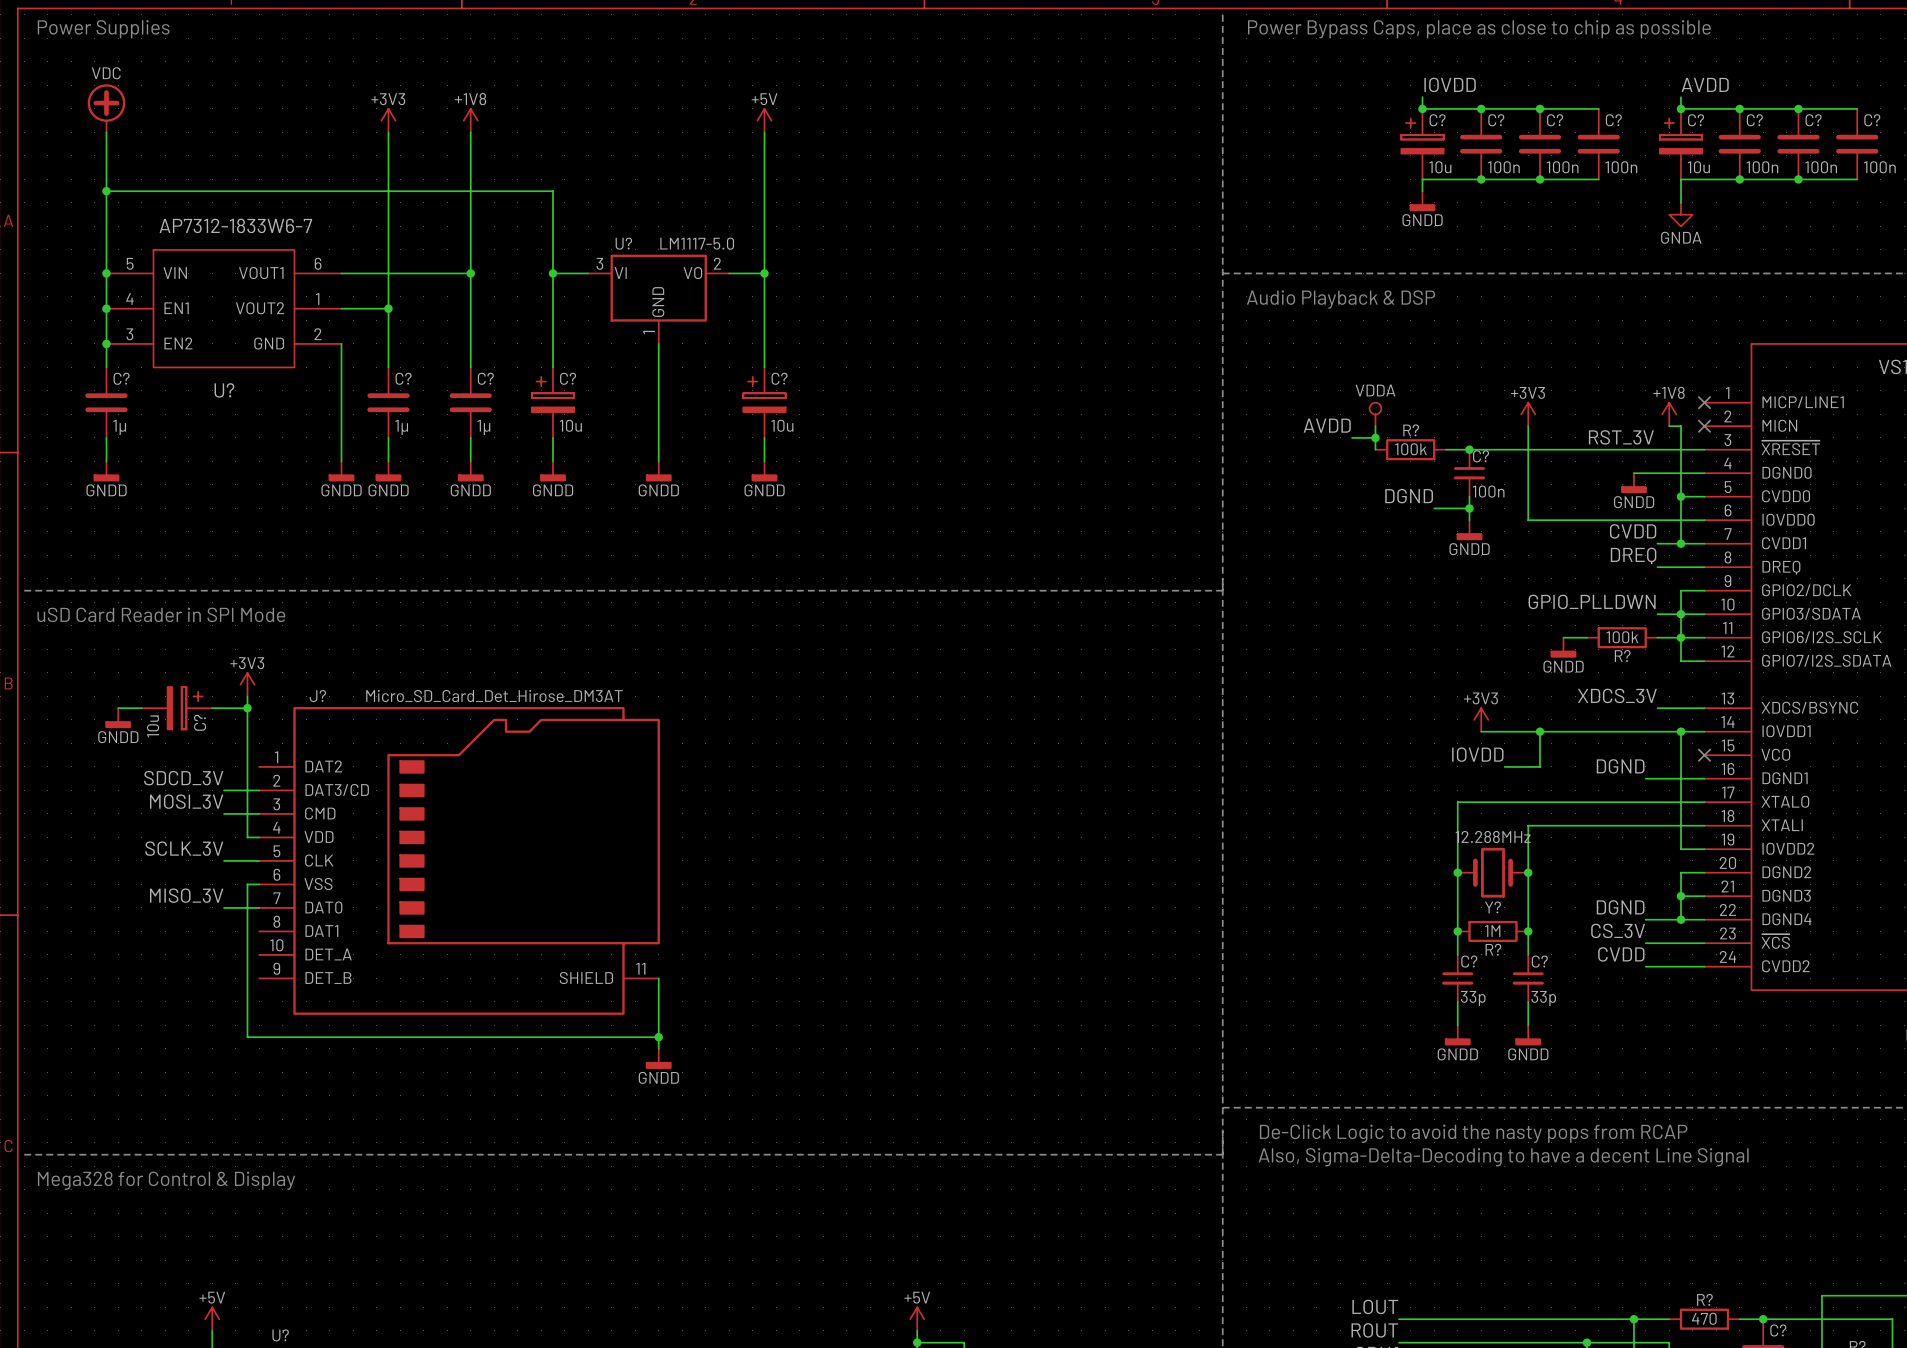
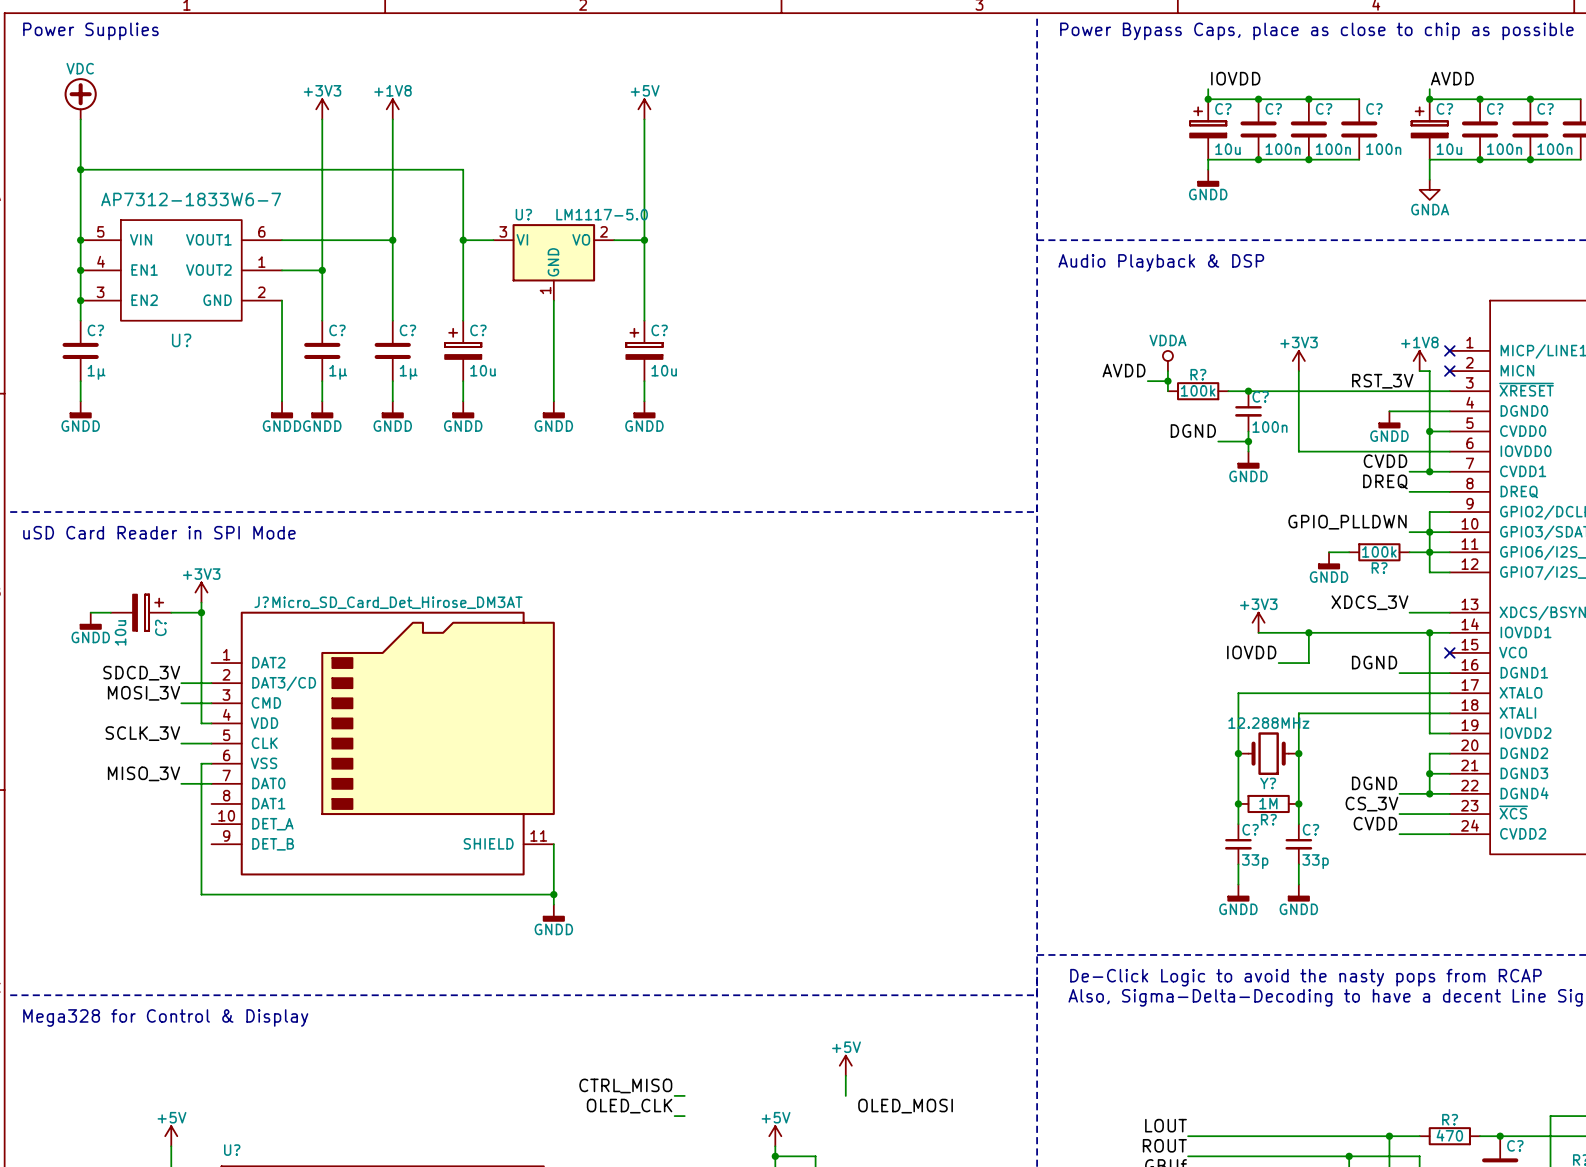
power symbol: none -> +5V (845, 1065)
wire: none -> (845, 1075) (845, 1095)
label: none -> CTRL_MISO (625, 1085)
wire: none -> (674, 1095) (684, 1095)
label: none -> OLED_CLK (629, 1106)
label: none -> OLED_MOSI (905, 1106)
wire: none -> (674, 1116) (684, 1116)

